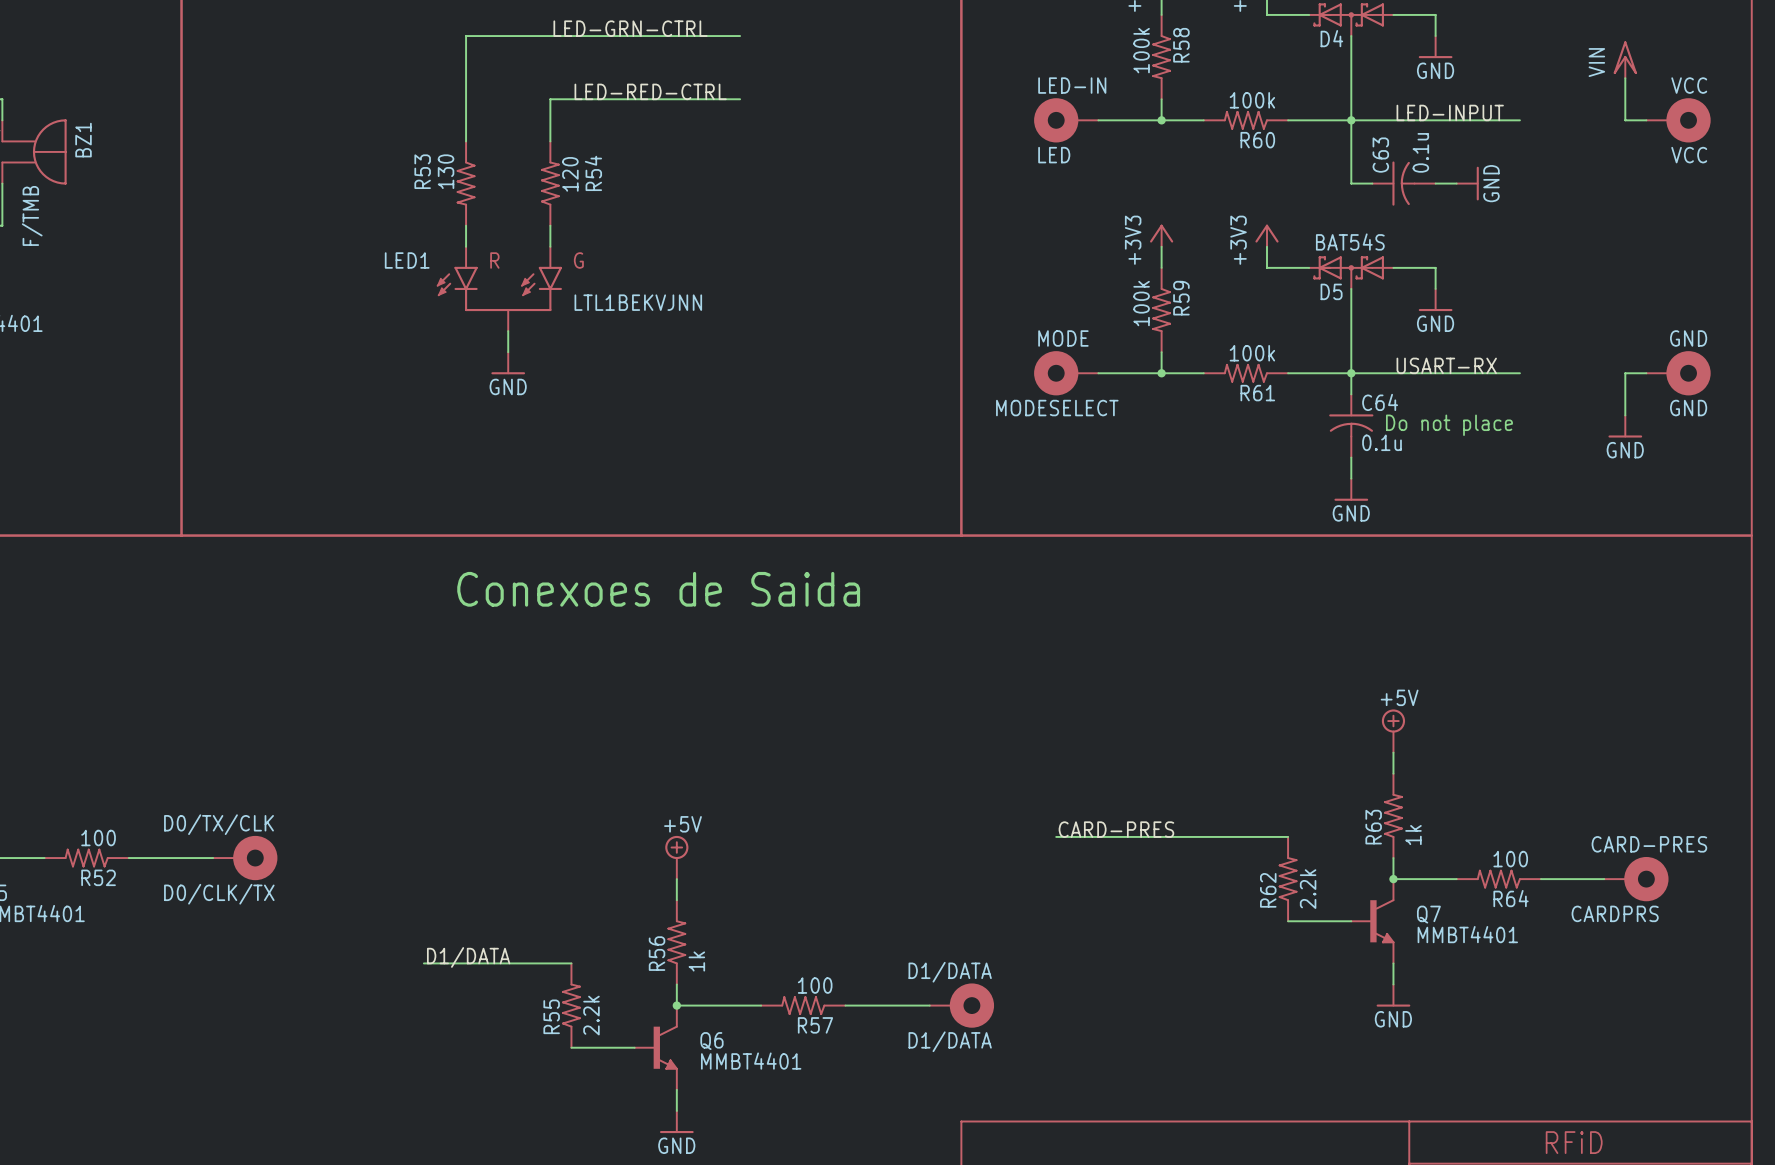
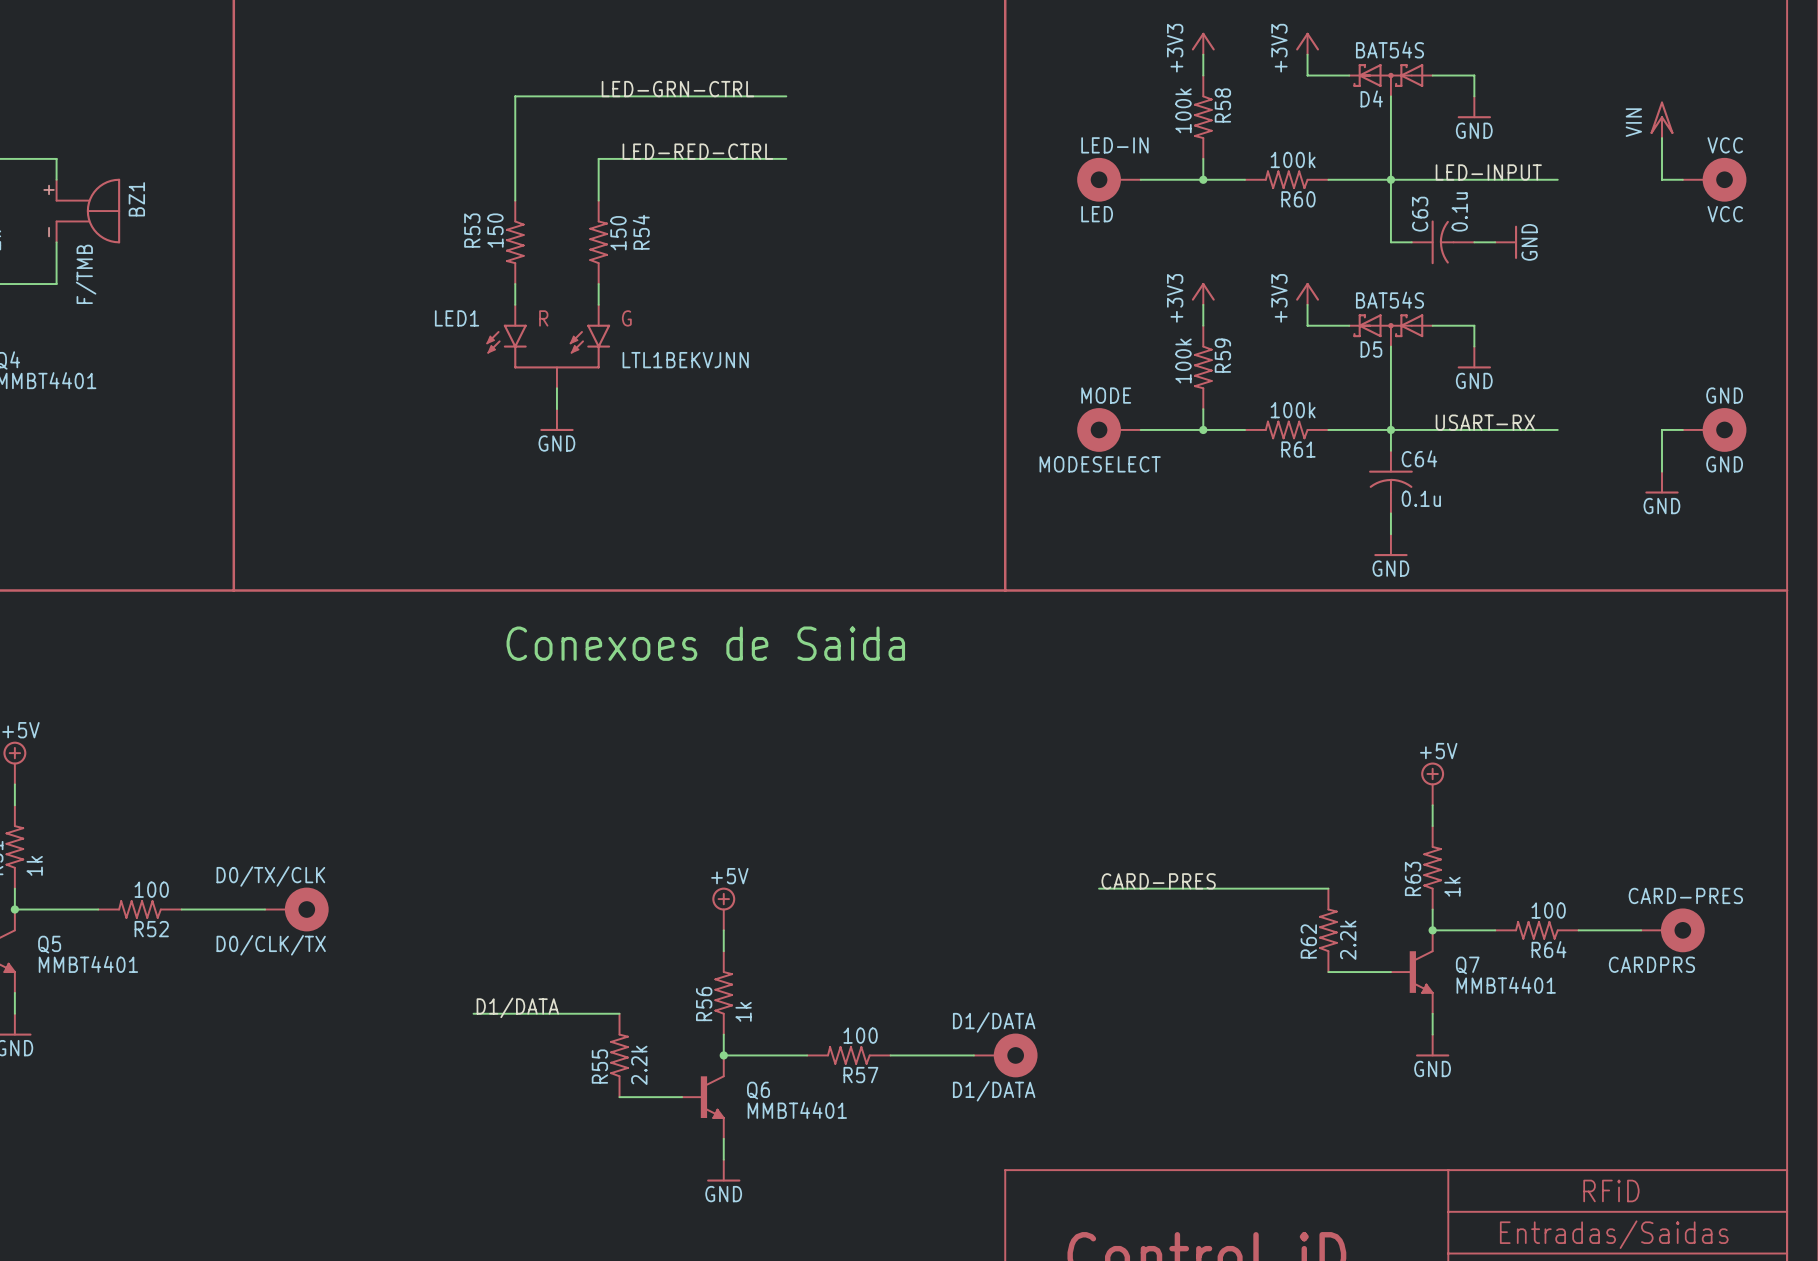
R53 value: 130 (446, 171) -> 150 (495, 230)
R54 value: 120 (570, 174) -> 150 (618, 233)
text: Do not place (1449, 425) -> none

